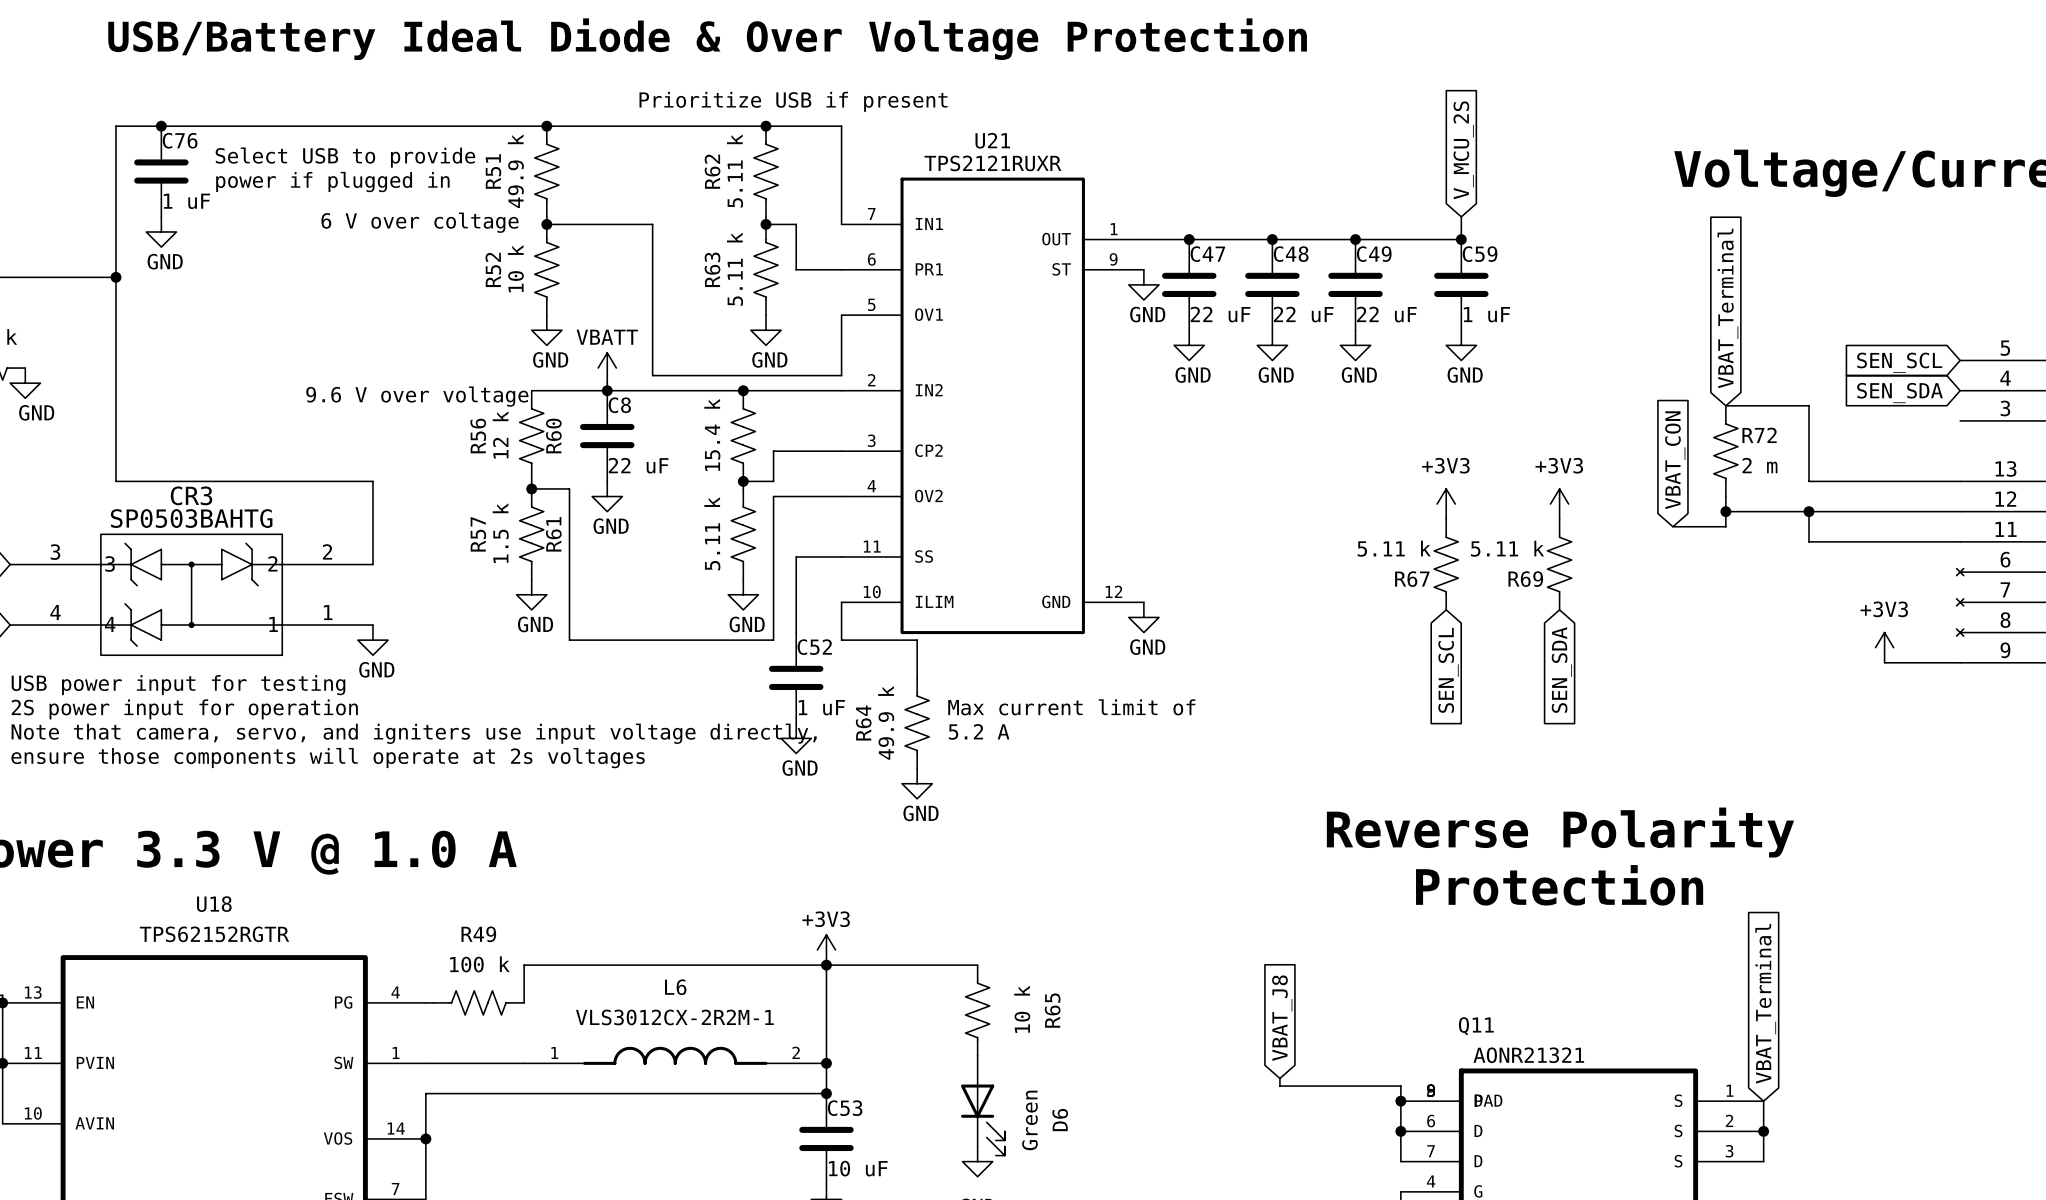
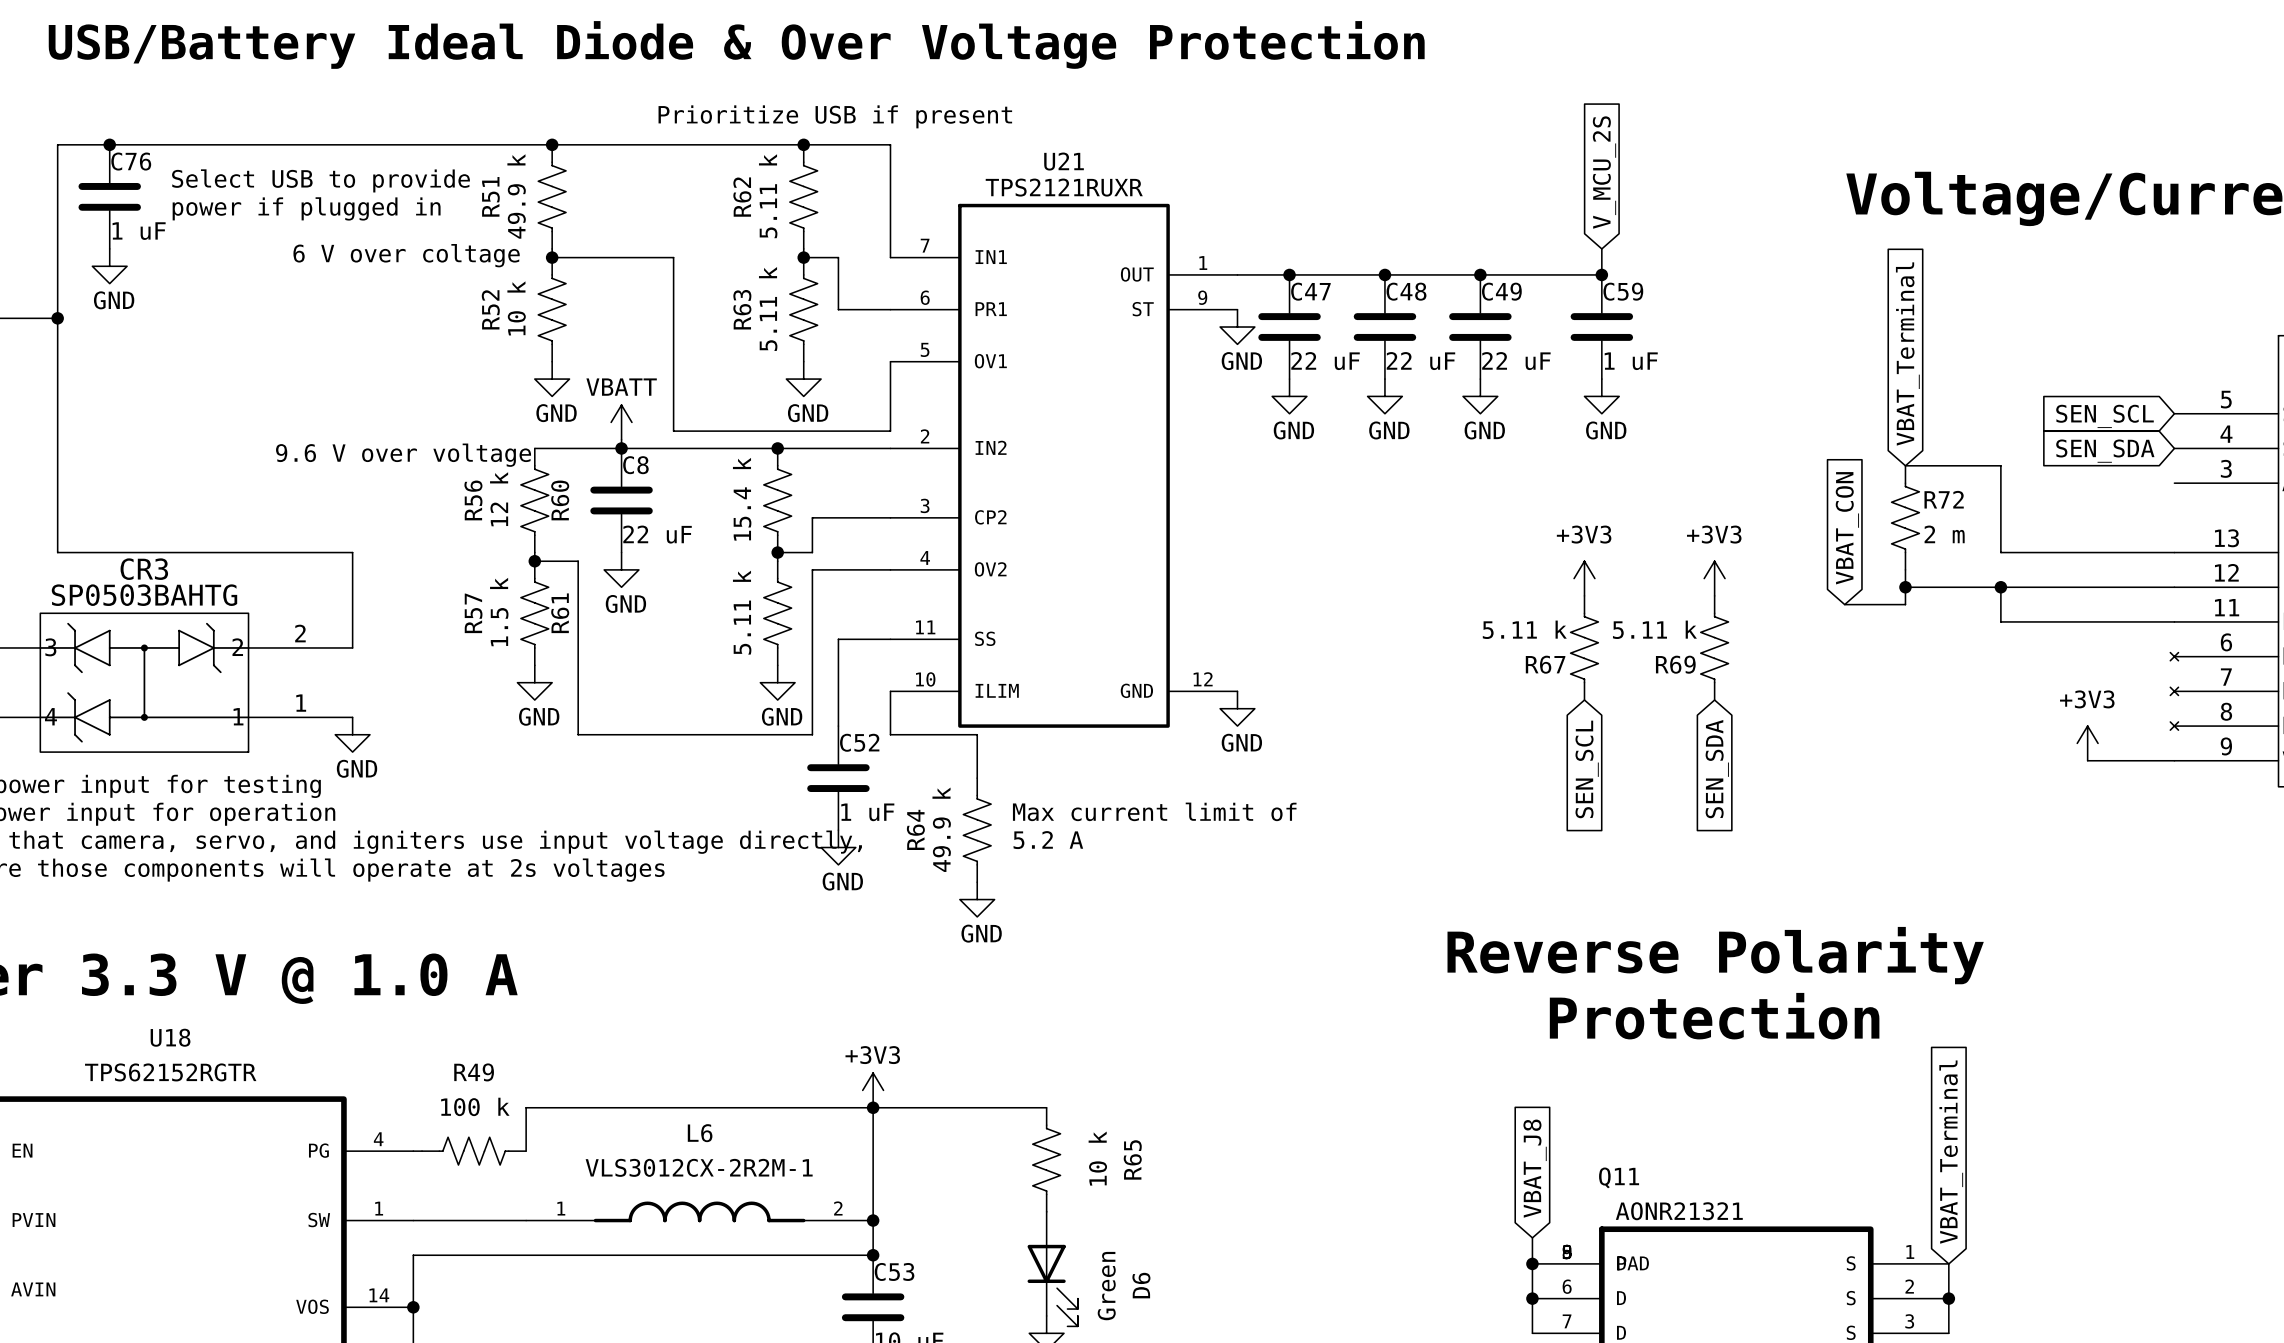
global label position: VBAT_J8 (1282, 1018) -> VBAT_J8 (1535, 1168)
wire: (1279, 1078) (1279, 1086) (1400, 1086) -> (1532, 1237) (1532, 1246)

